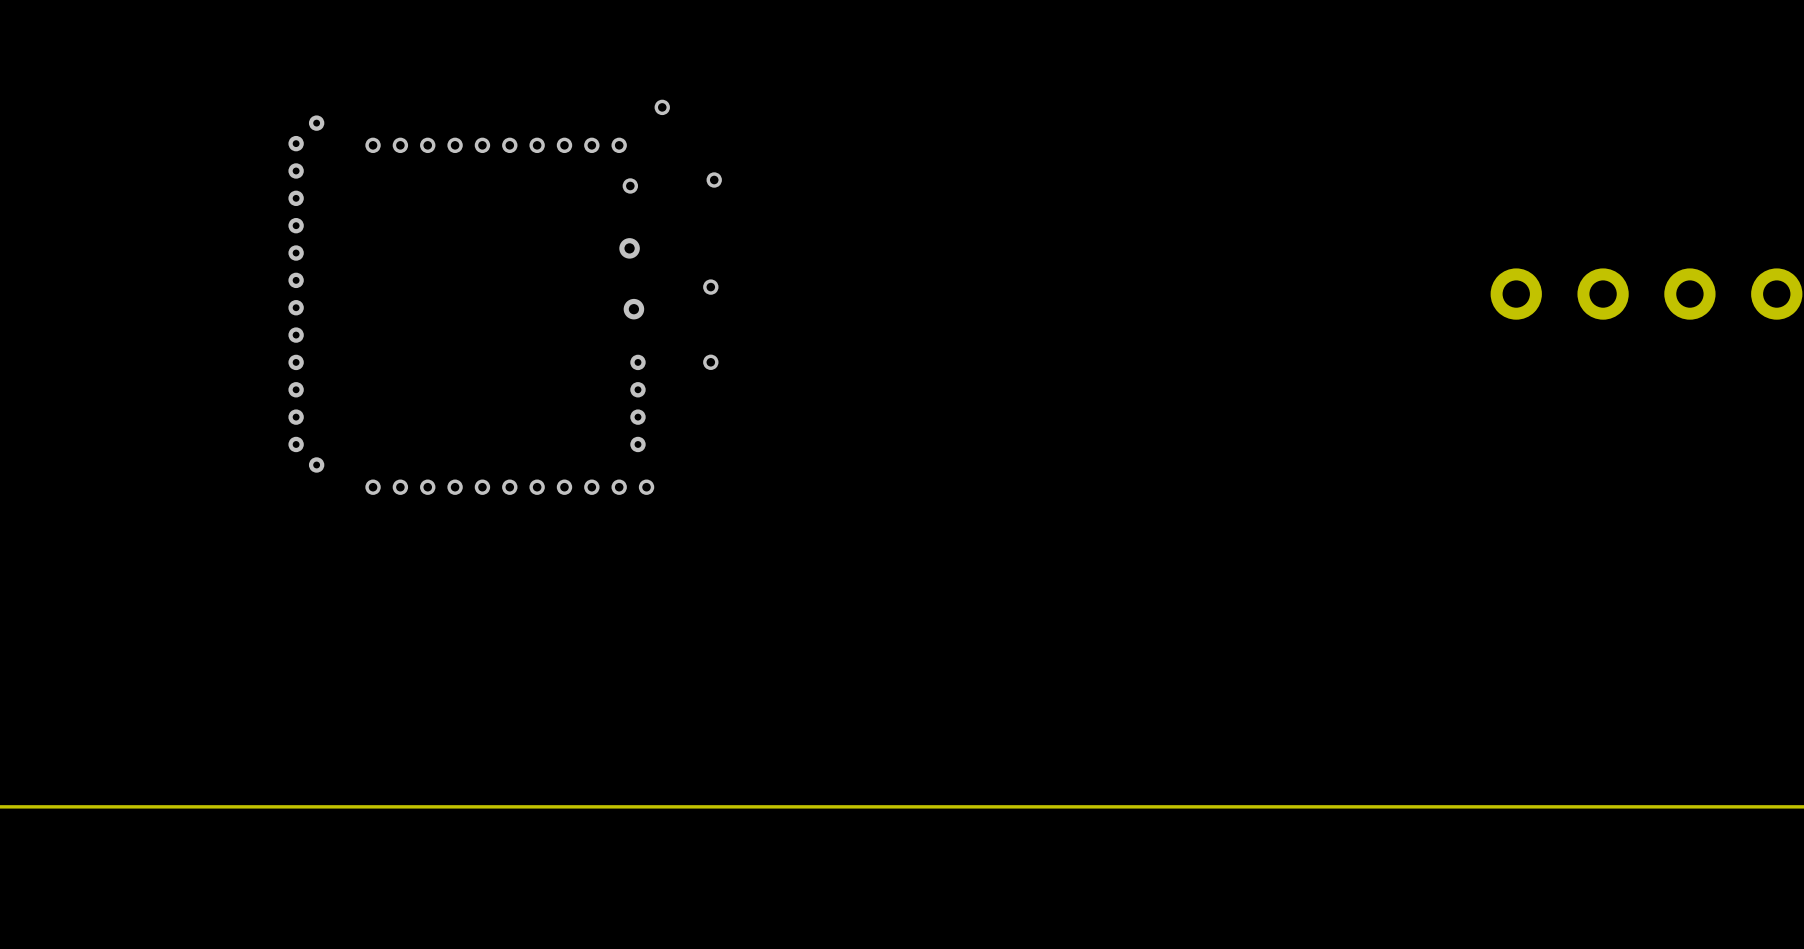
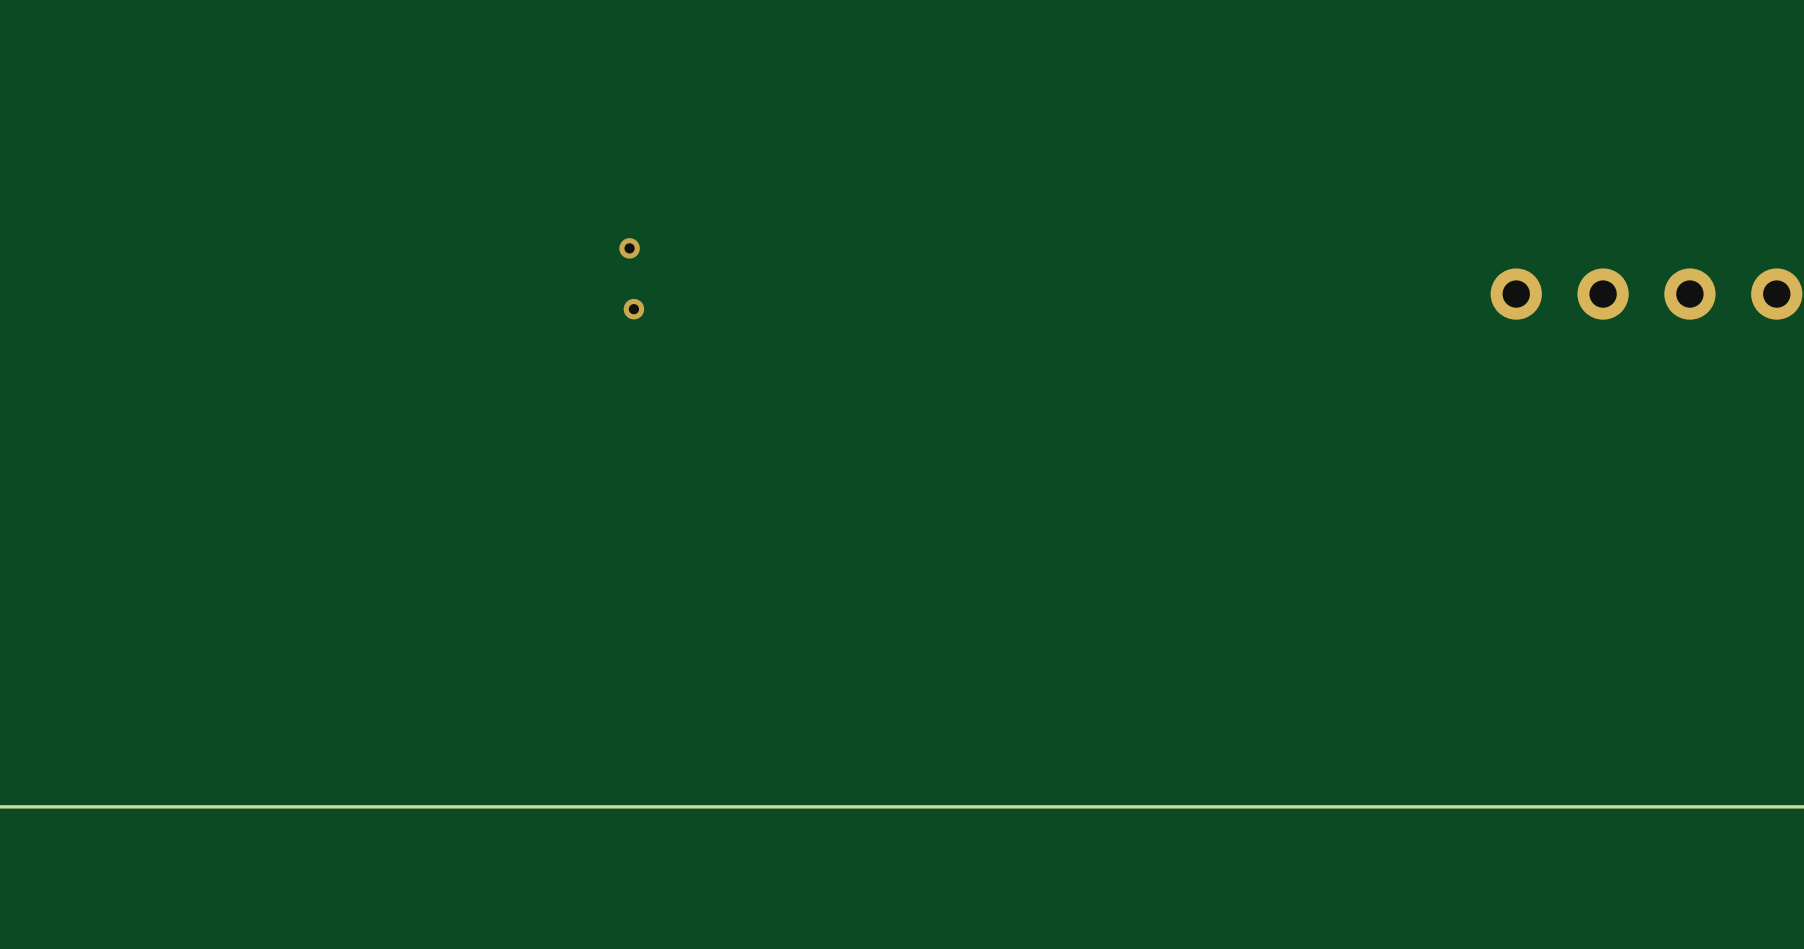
via: (662, 107) -> none
via: (316, 123) -> none
via: (296, 143) -> none
via: (373, 145) -> none
via: (400, 145) -> none
via: (427, 145) -> none
via: (455, 145) -> none
via: (482, 145) -> none
via: (509, 145) -> none
via: (537, 145) -> none
via: (564, 145) -> none
via: (591, 145) -> none
via: (619, 145) -> none
via: (296, 170) -> none
via: (714, 180) -> none
via: (630, 185) -> none
via: (296, 198) -> none
via: (296, 225) -> none
via: (296, 253) -> none
via: (296, 280) -> none
via: (710, 287) -> none
via: (296, 307) -> none
via: (296, 335) -> none
via: (296, 362) -> none
via: (637, 362) -> none
via: (710, 362) -> none
via: (296, 389) -> none
via: (637, 389) -> none
via: (296, 417) -> none
via: (637, 417) -> none
via: (296, 444) -> none
via: (637, 444) -> none
via: (316, 464) -> none
via: (373, 487) -> none
via: (400, 487) -> none
via: (427, 487) -> none
via: (455, 487) -> none
via: (482, 487) -> none
via: (509, 487) -> none
via: (537, 487) -> none
via: (564, 487) -> none
via: (591, 487) -> none
via: (619, 487) -> none
via: (646, 487) -> none

